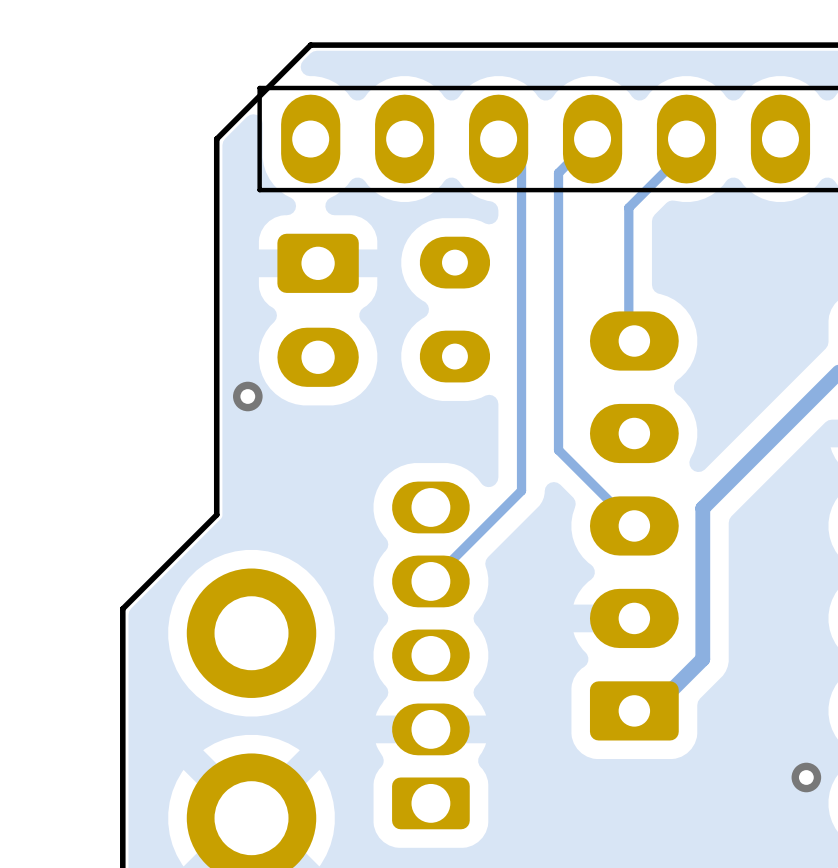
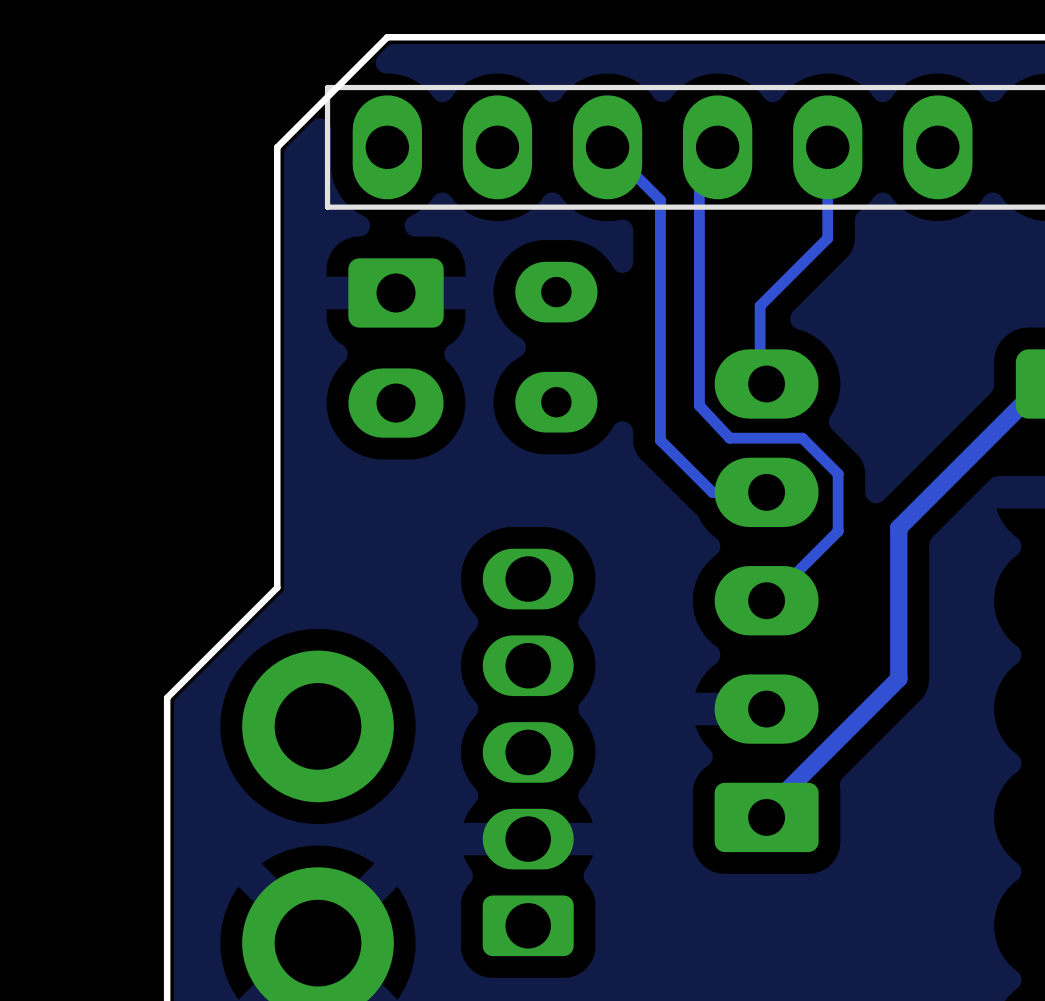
track: (686, 150) (628, 207) (628, 274) -> (827, 160) (827, 238) (760, 305)
track: (577, 154) (558, 173) (558, 450) (634, 525) -> (699, 165) (699, 405) (729, 438) (802, 438) (838, 473) (838, 531) (768, 600)
track: (521, 161) (521, 490) (430, 581) -> (634, 174) (660, 200) (660, 440) (712, 492) (760, 492)
via: (247, 396) -> none
track: (747, 463) (702, 508) (702, 659) (651, 710) (628, 710) -> (898, 527) (898, 678) (760, 817)
via: (806, 777) -> none

